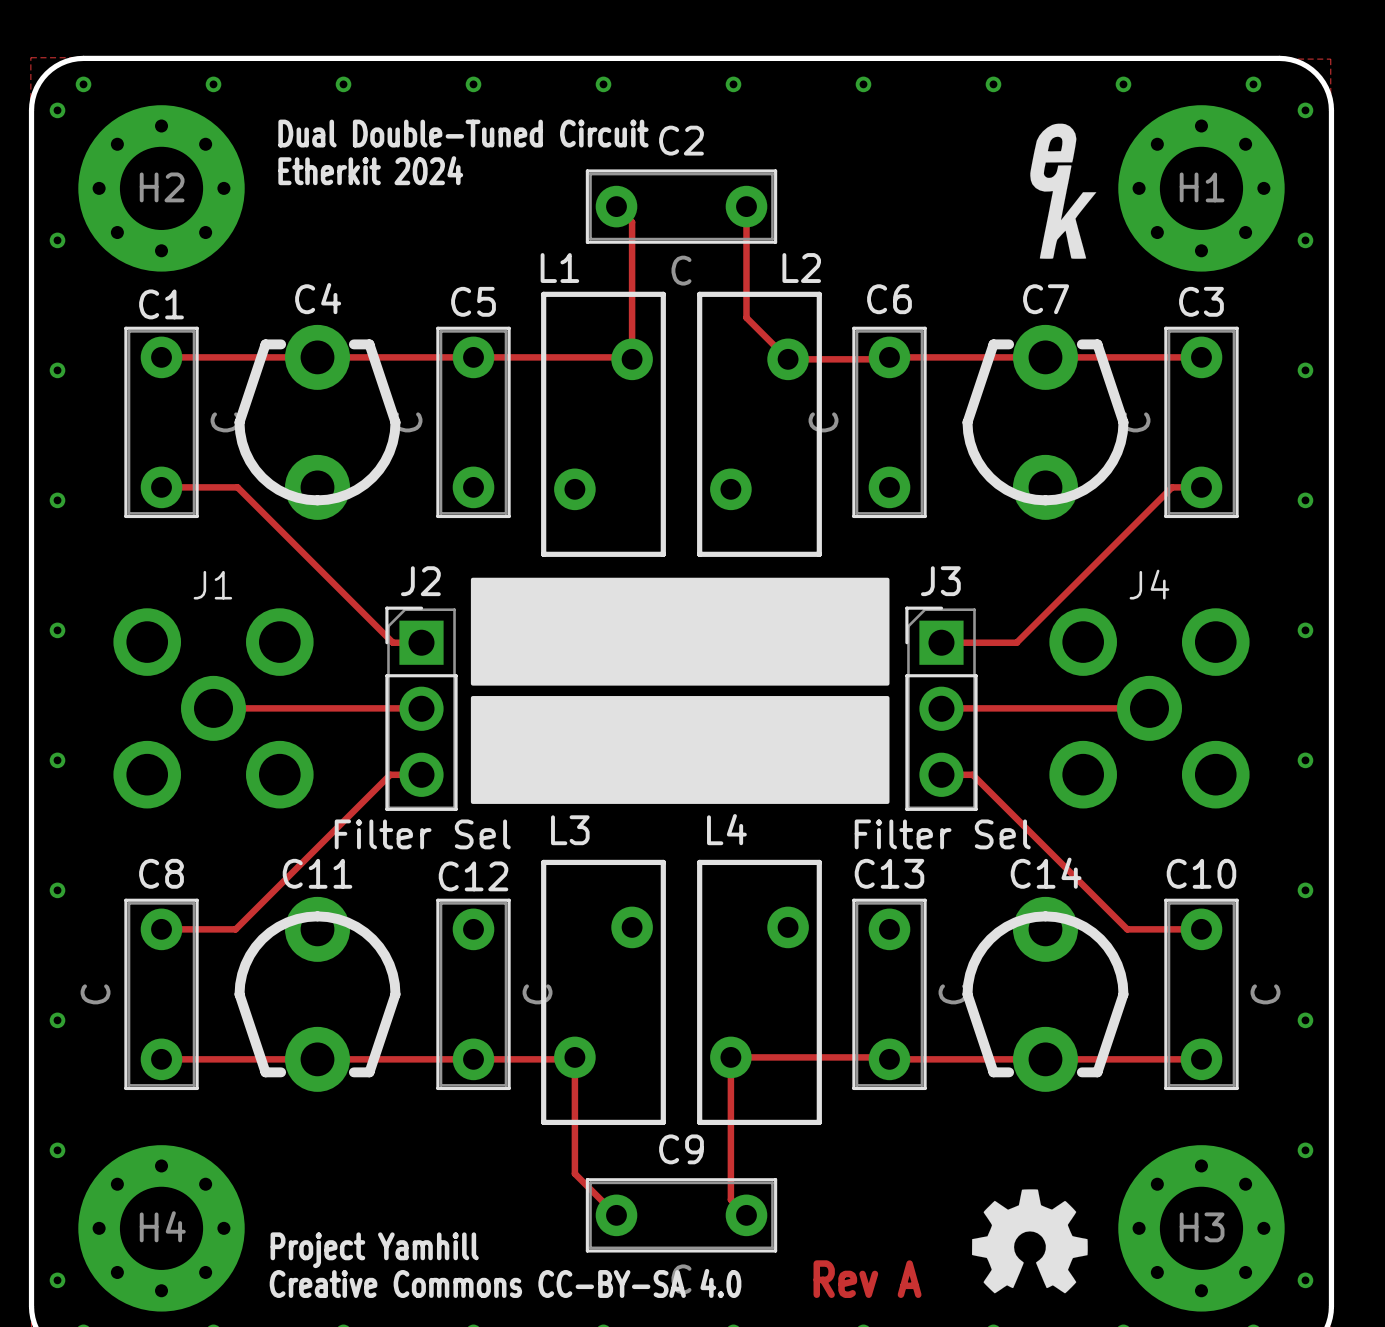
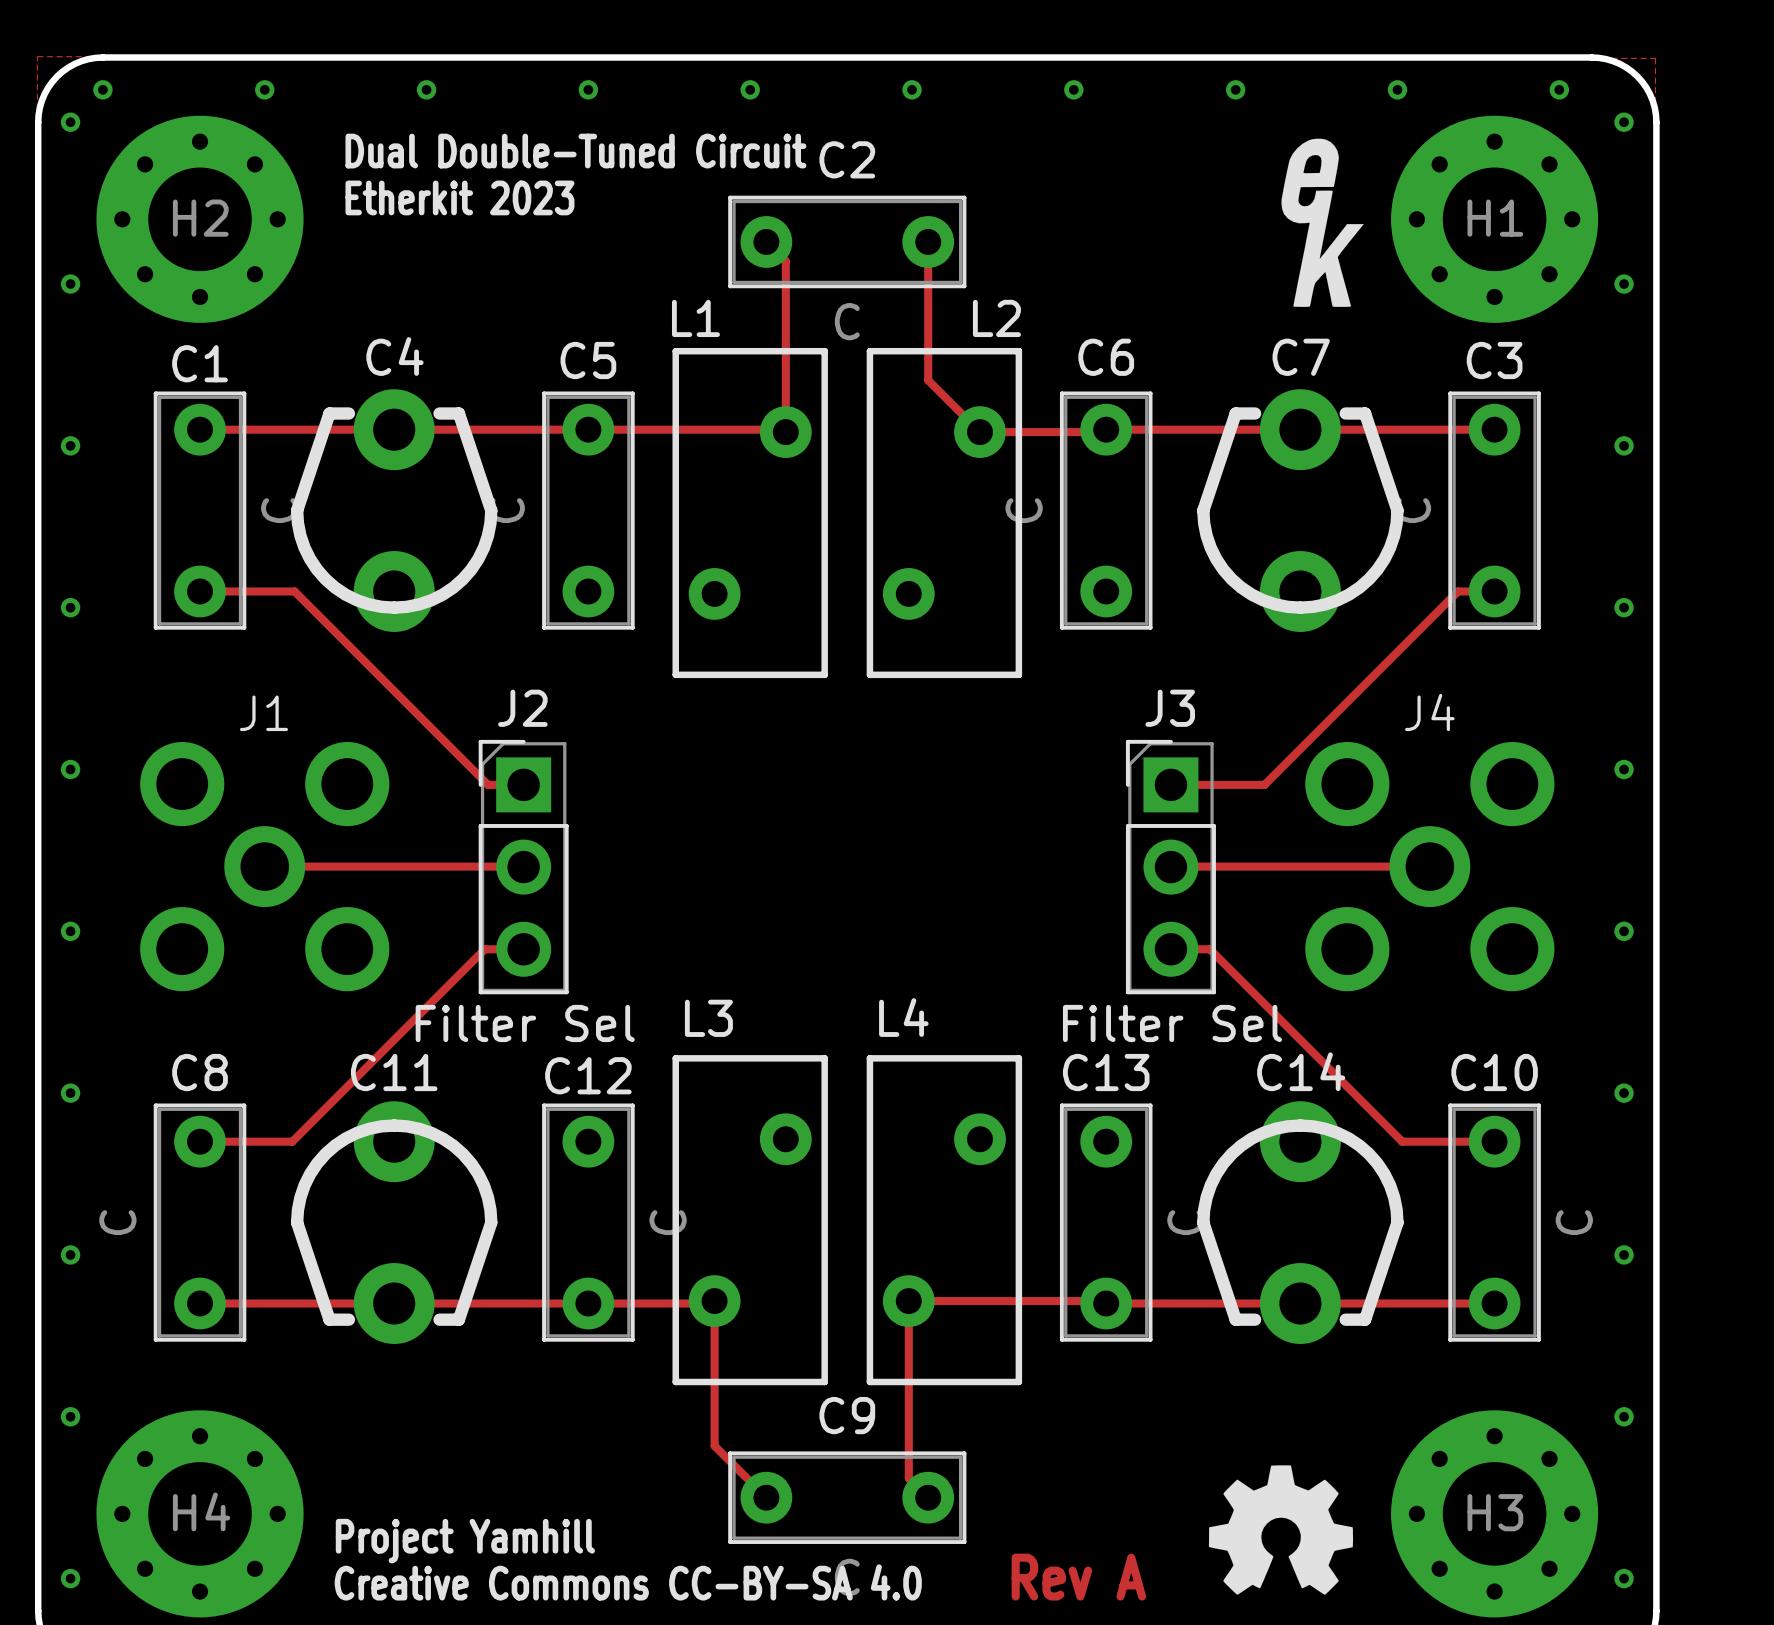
text: Etherkit 2024 (370, 170) -> Etherkit 2023 (459, 197)
drawing: [470, 577, 890, 804] -> none

